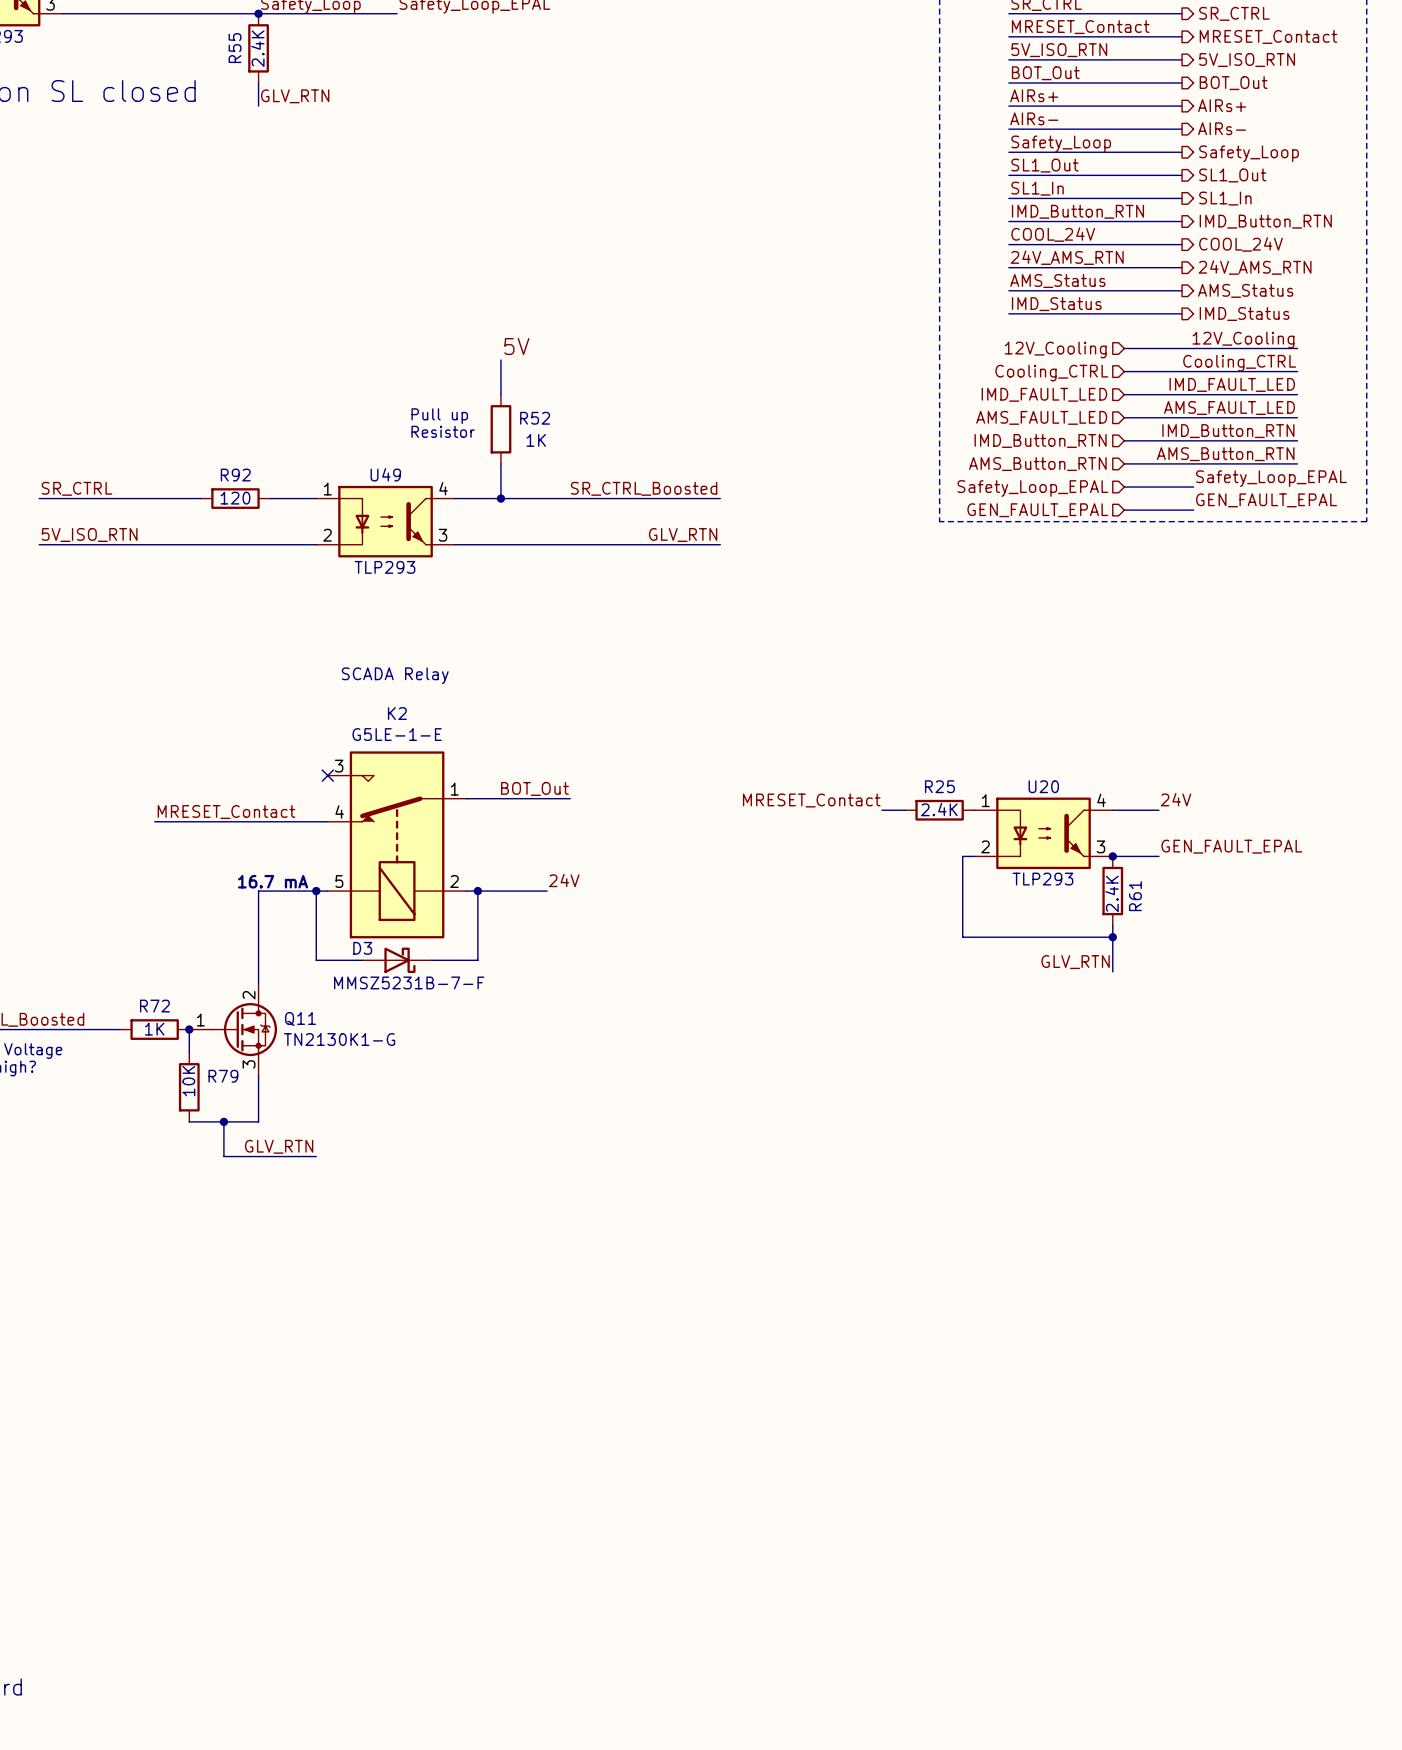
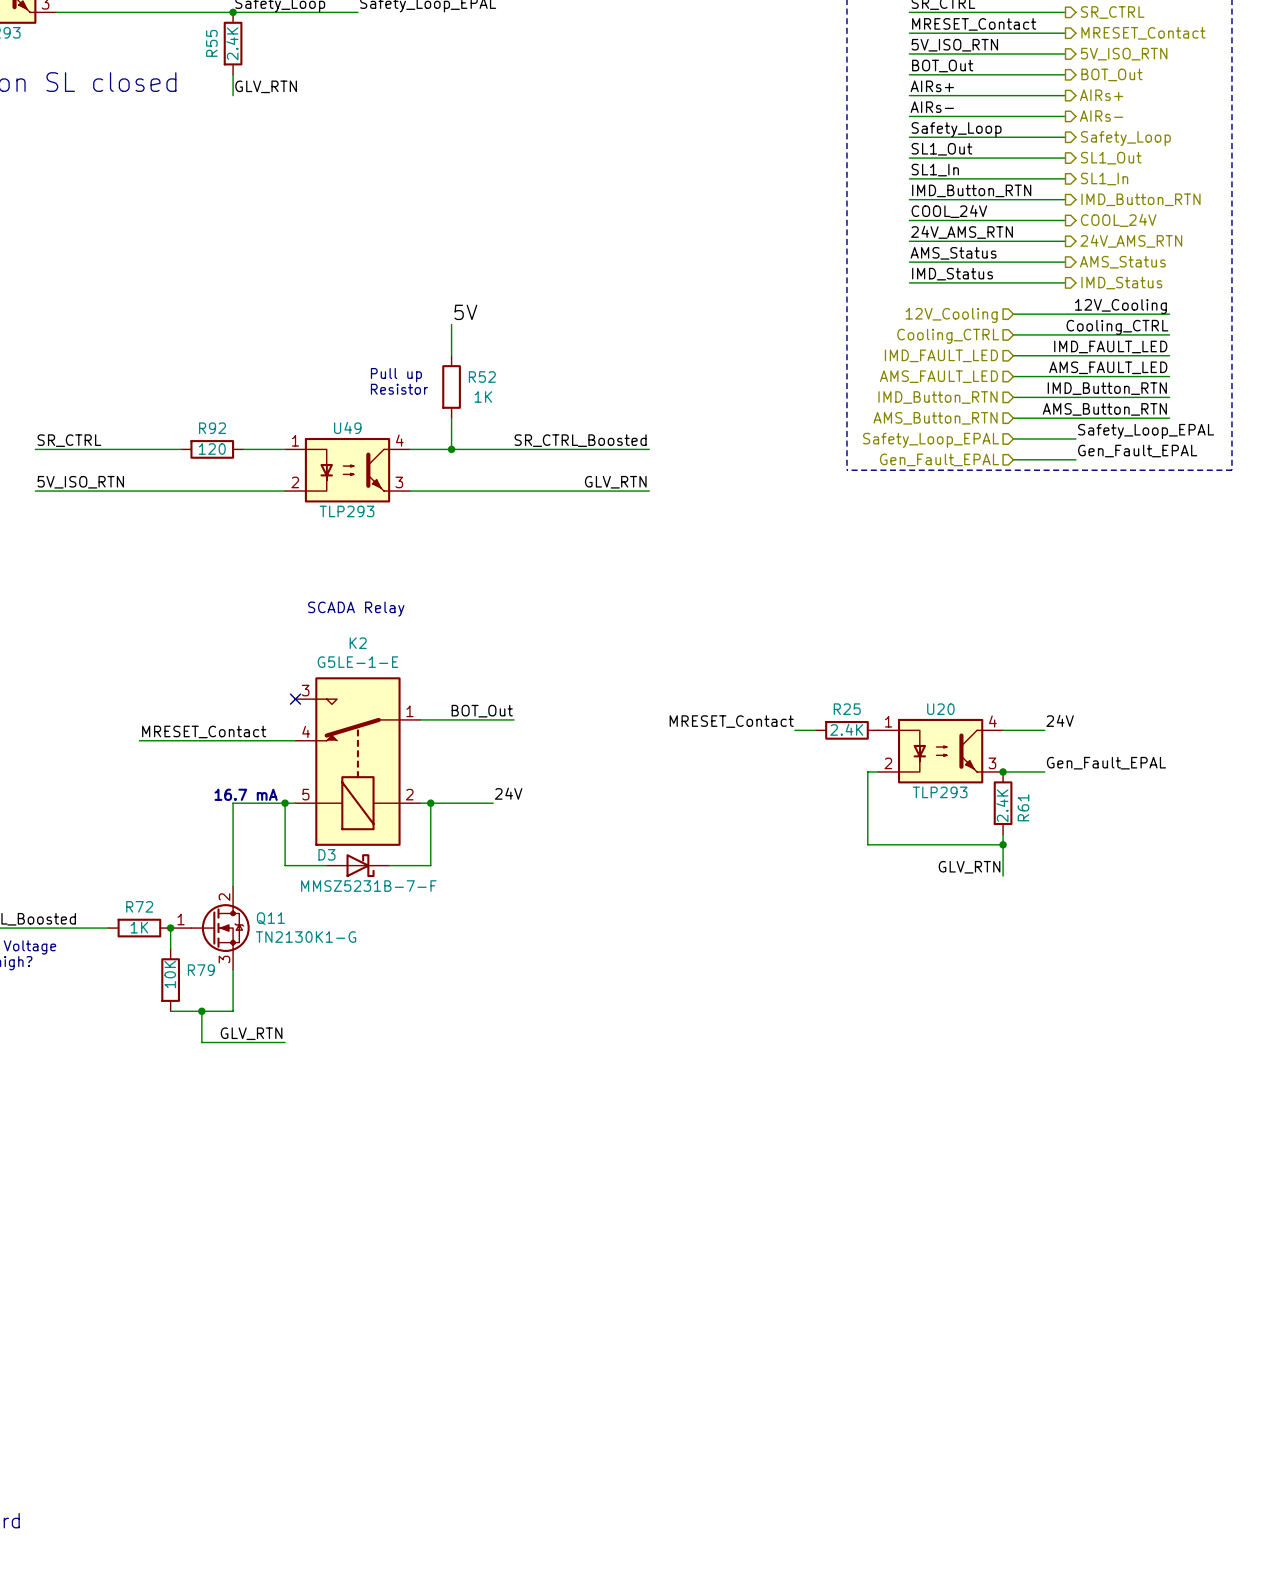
label: GEN_FAULT_EPAL (1266, 500) -> Gen_Fault_EPAL (1137, 451)
hierarchical label: GEN_FAULT_EPAL (1037, 510) -> Gen_Fault_EPAL (939, 459)
label: GEN_FAULT_EPAL (1231, 846) -> Gen_Fault_EPAL (1106, 763)

